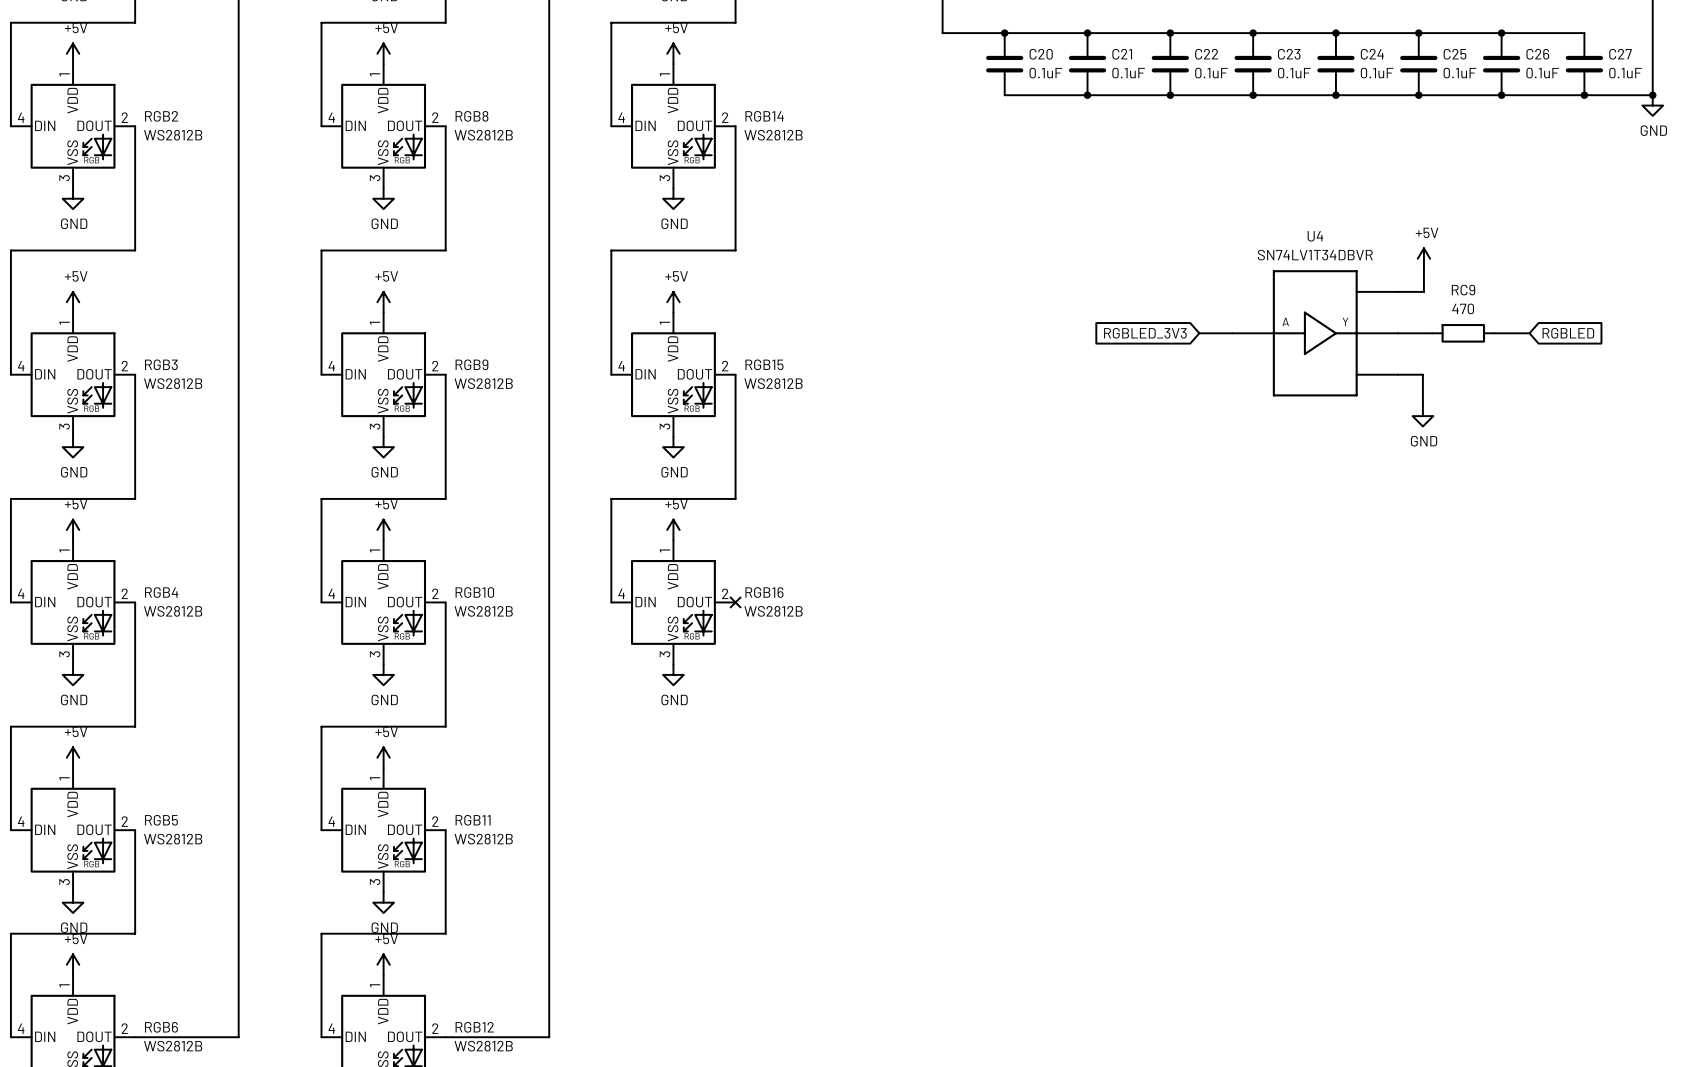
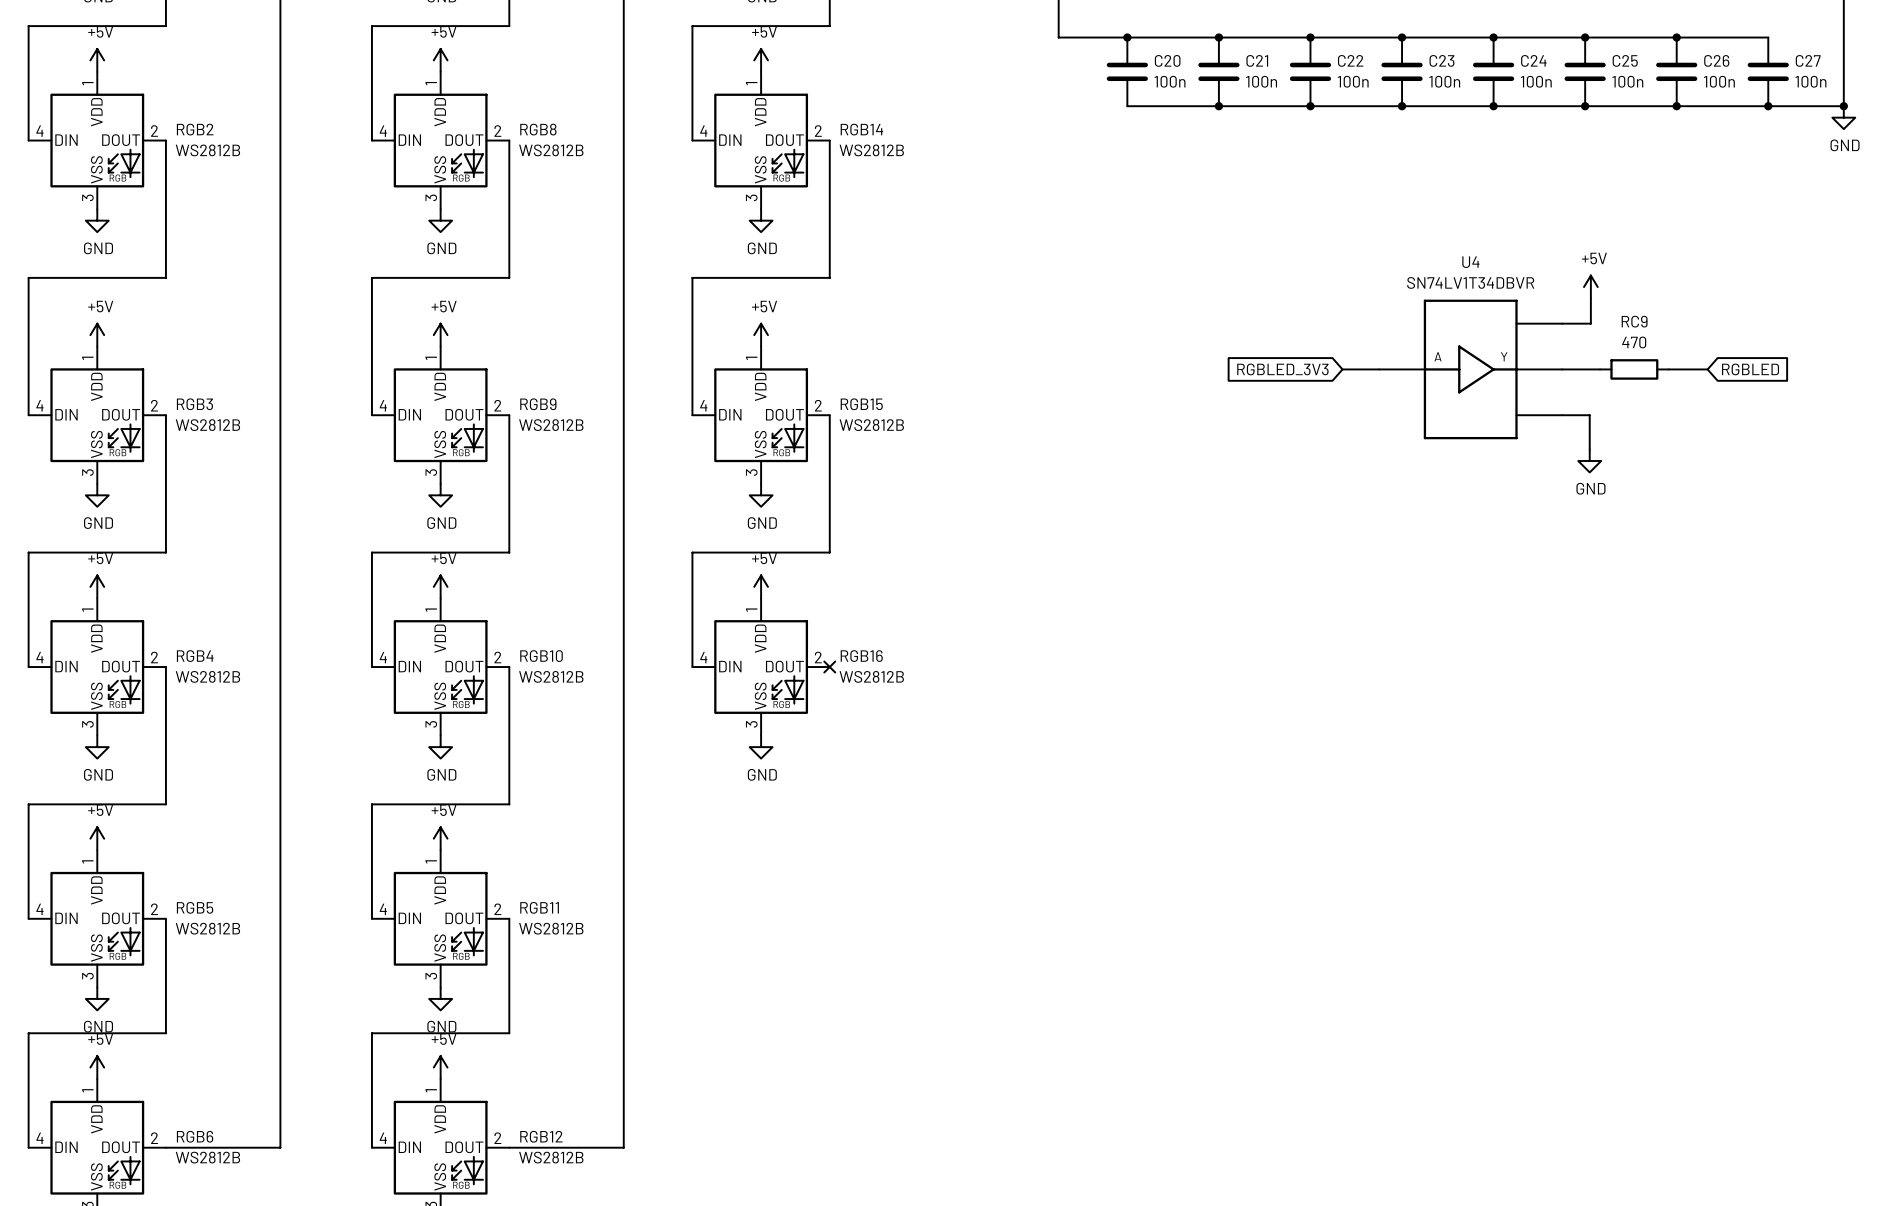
C20 value: 0.1uF (1045, 73) -> 100n (1170, 81)
C21 value: 0.1uF (1128, 73) -> 100n (1261, 81)
C22 value: 0.1uF (1211, 73) -> 100n (1353, 81)
C23 value: 0.1uF (1294, 73) -> 100n (1444, 81)
C24 value: 0.1uF (1377, 73) -> 100n (1536, 81)
C25 value: 0.1uF (1459, 73) -> 100n (1627, 81)
C26 value: 0.1uF (1542, 73) -> 100n (1719, 81)
C27 value: 0.1uF (1625, 73) -> 100n (1810, 81)

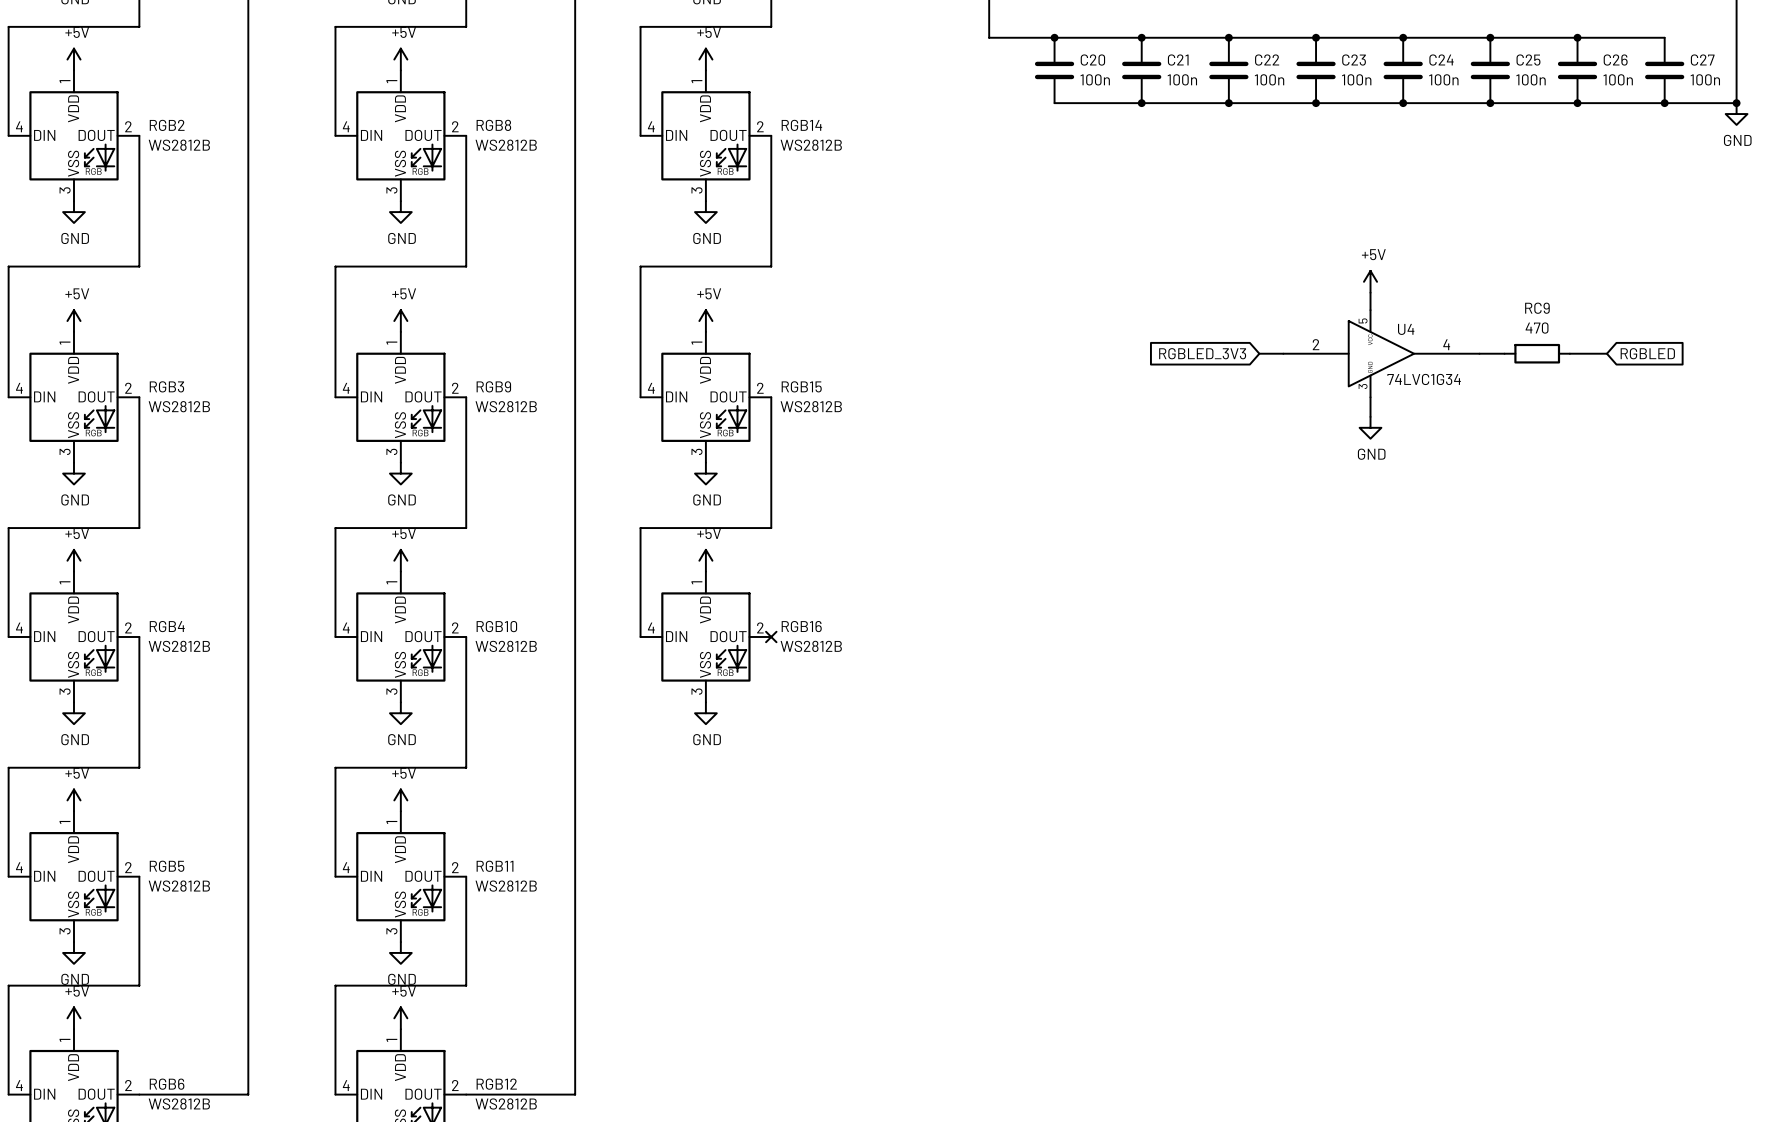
U4 name position: U4 (1470, 262) -> U4 (1406, 329)
U4 value: SN74LV1T34DBVR (1470, 282) -> 74LVC1G34 (1424, 379)
power symbol position: +5V (1590, 287) -> +5V (1370, 281)
wire: (1590, 298) (1590, 323) (1562, 323) -> none
U4 symbol: [1379, 299, 1563, 440] -> [1283, 310, 1480, 398]
wire: none -> (1370, 292) (1370, 310)
wire: none -> (1370, 397) (1370, 416)
wire: (1562, 415) (1589, 415) (1589, 449) -> none
power symbol position: GND (1589, 461) -> GND (1370, 427)

